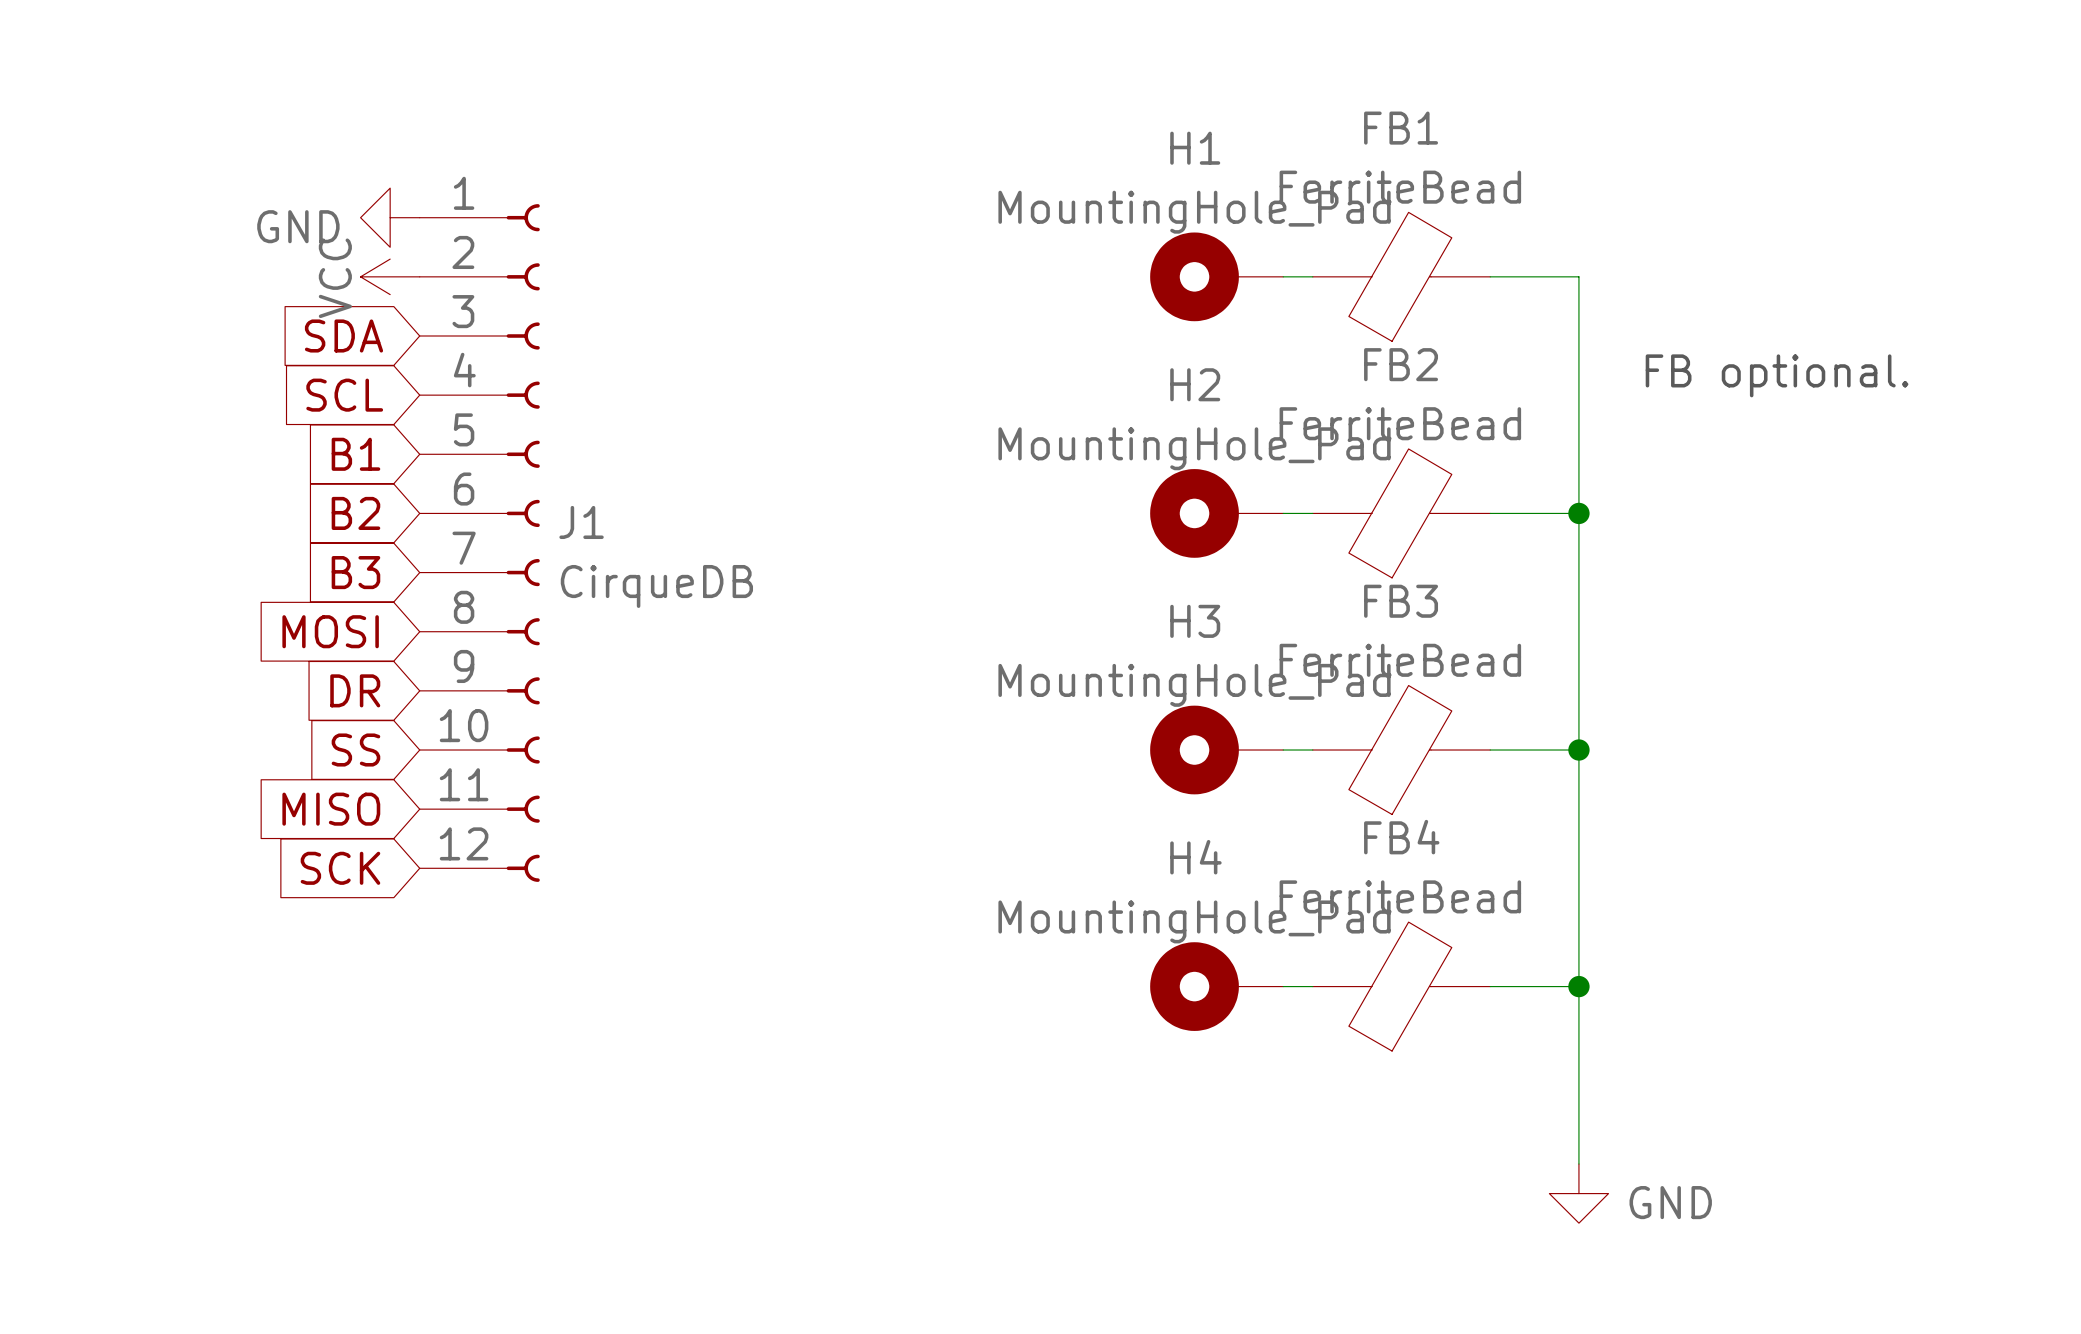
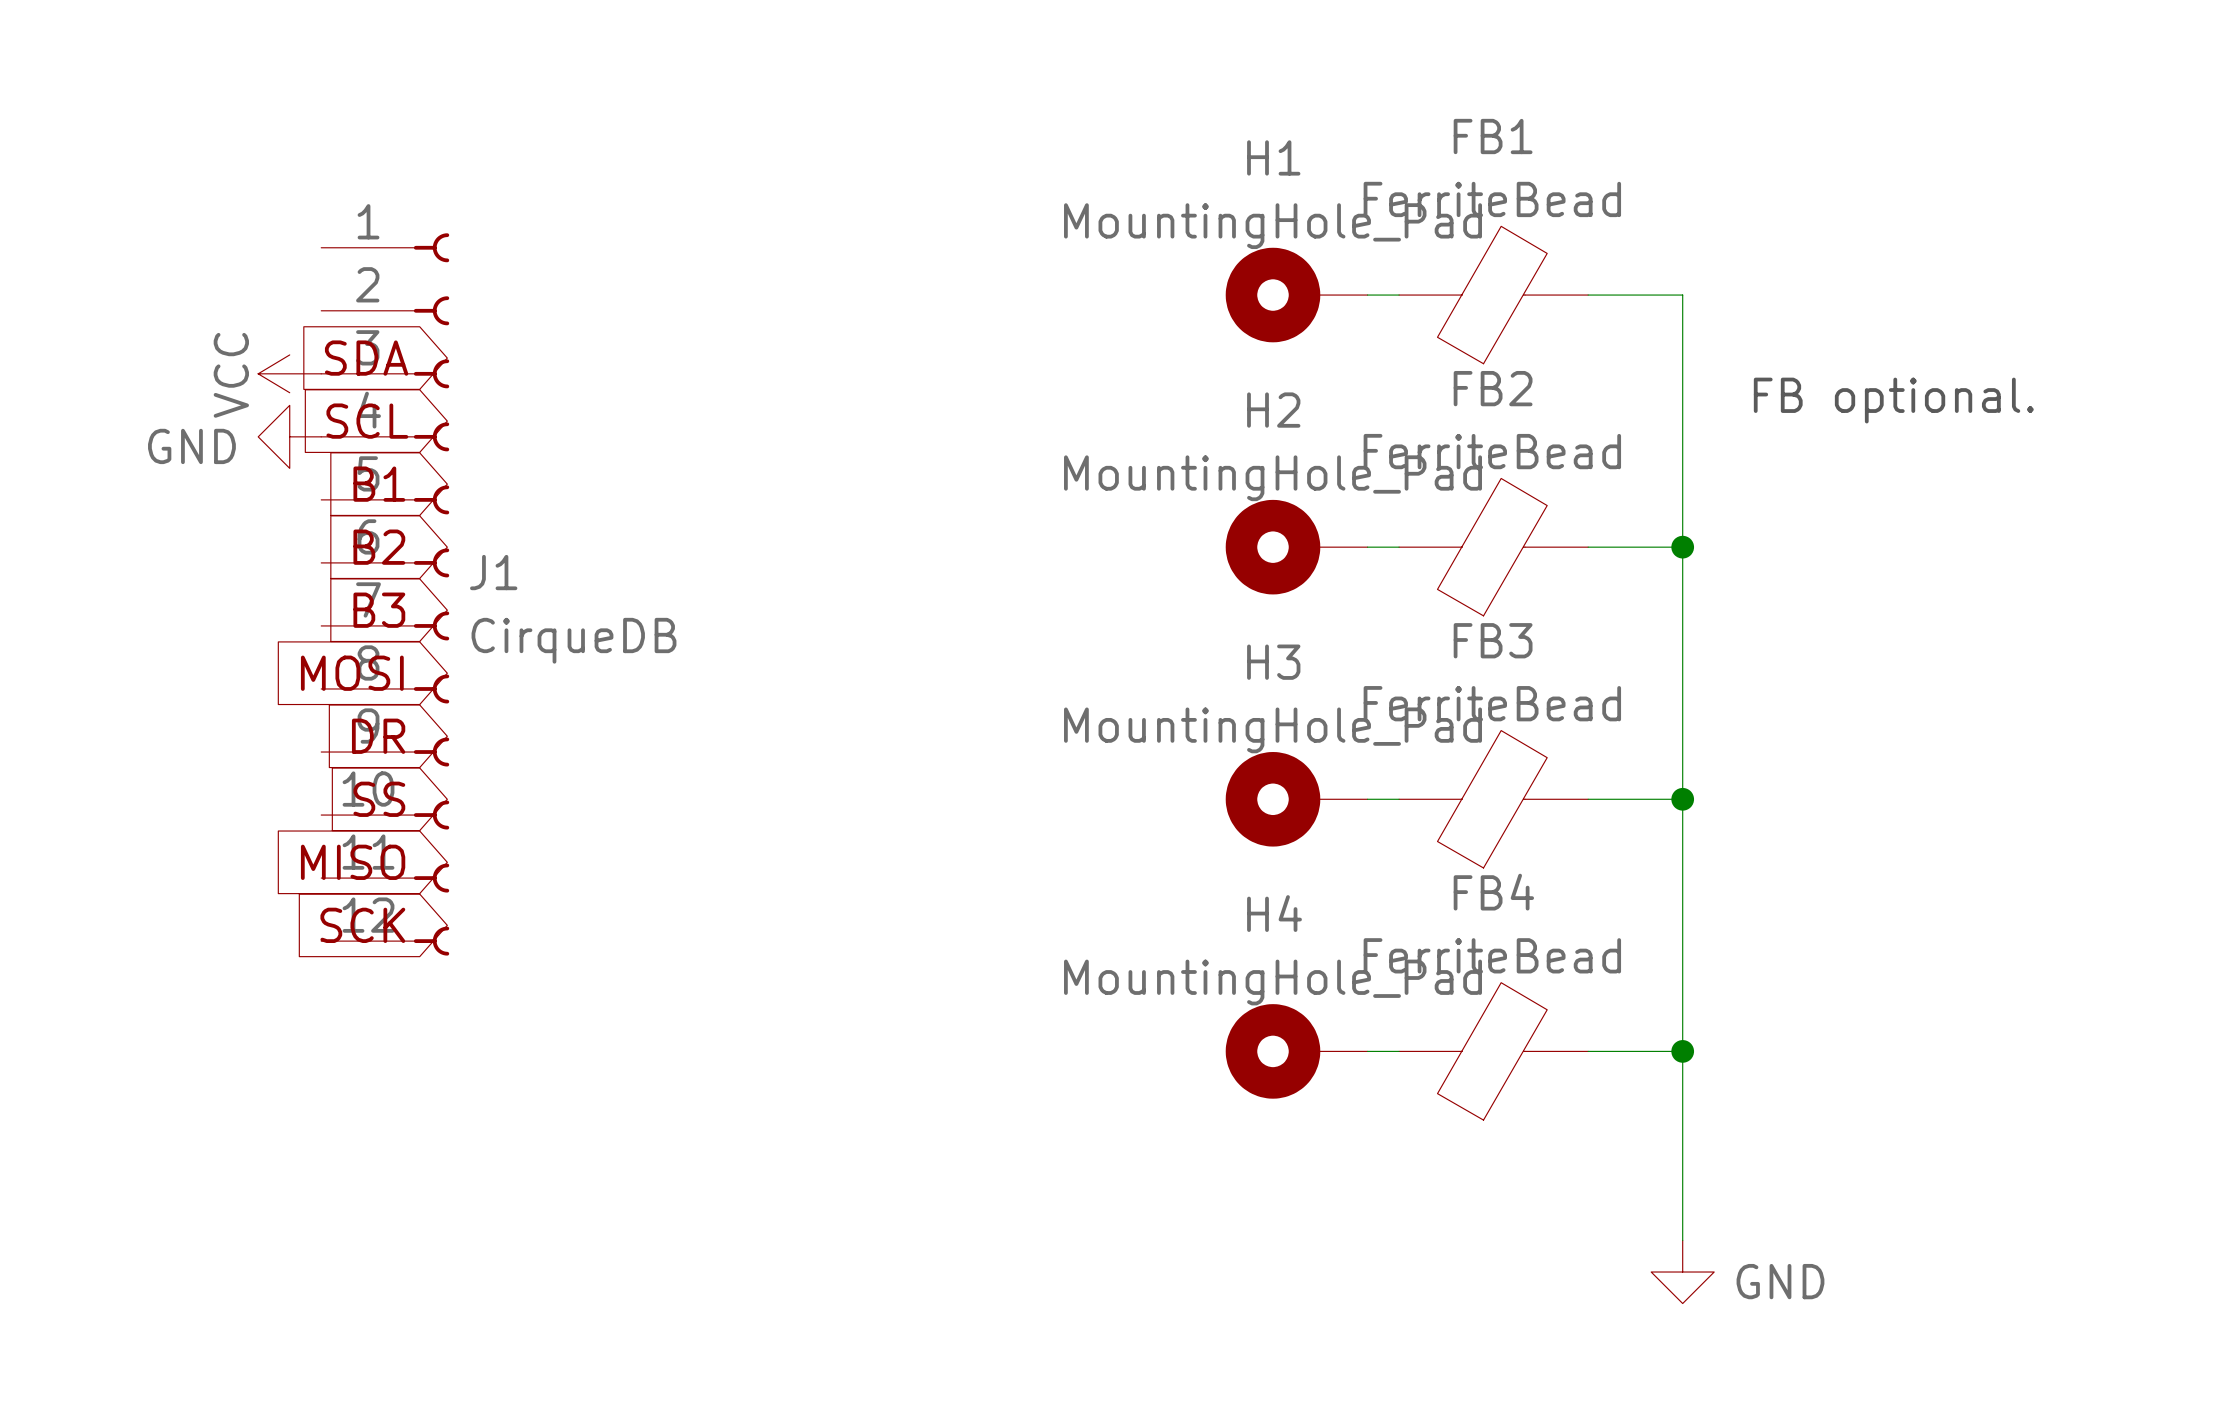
power symbol position: GND (390, 217) -> GND (289, 436)
power symbol position: VCC (390, 276) -> VCC (289, 373)
J1 position: (479, 543) -> (385, 594)

